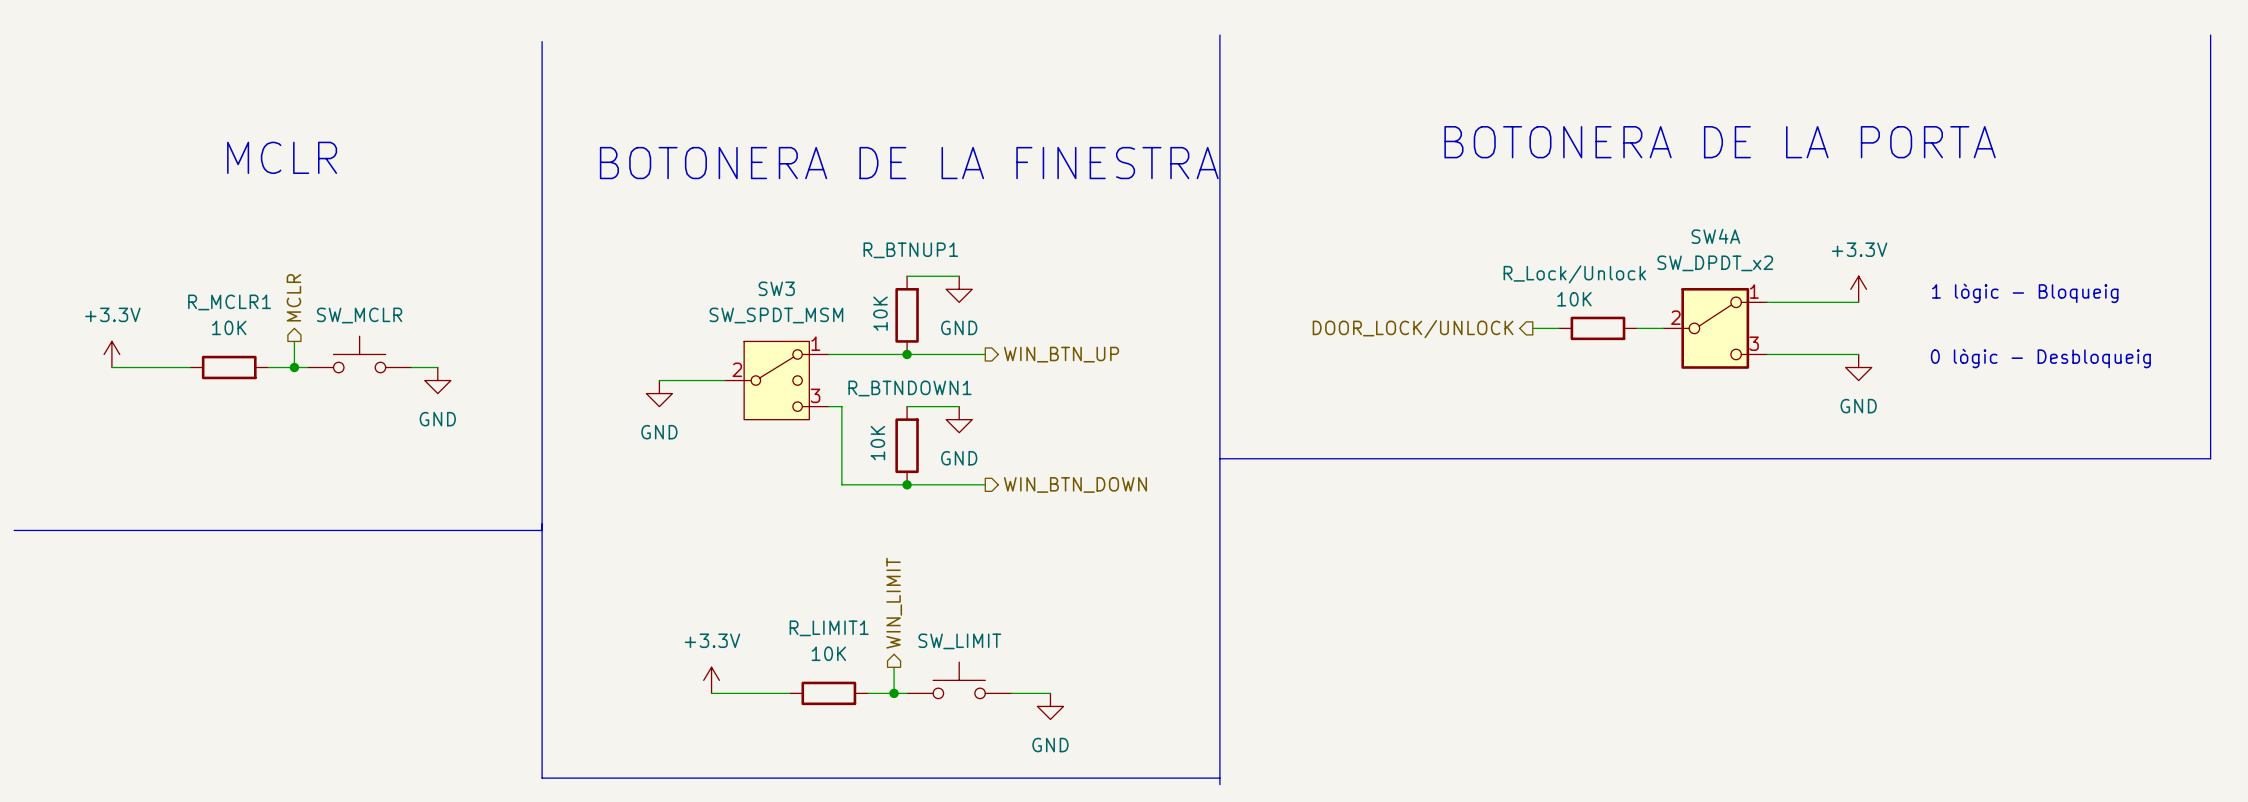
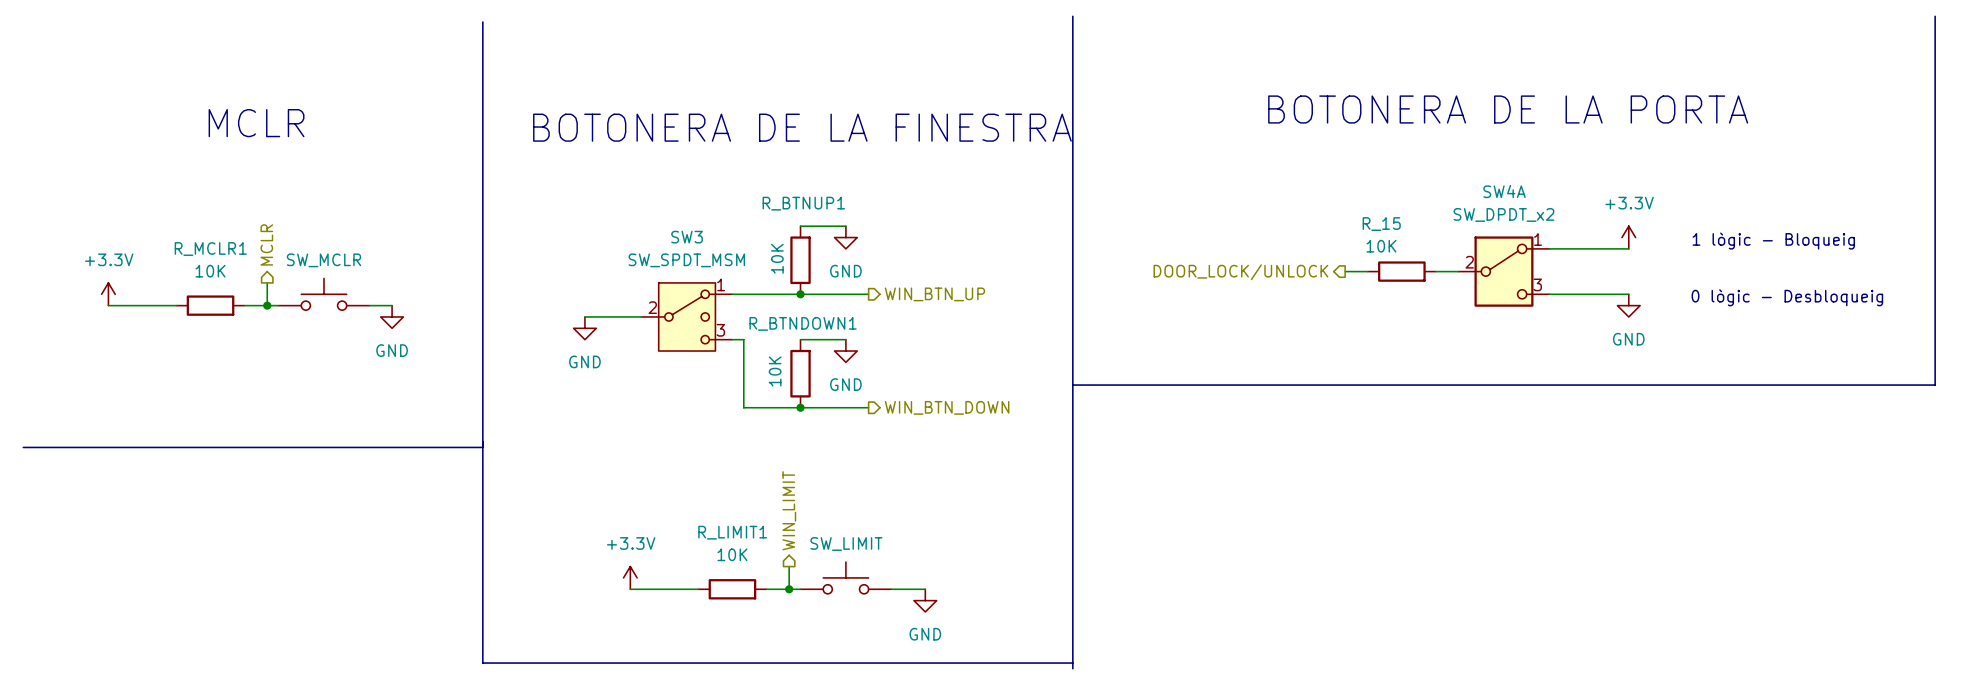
R_Lock/Unlock name: R_Lock/Unlock (1574, 274) -> R_15 (1381, 224)

